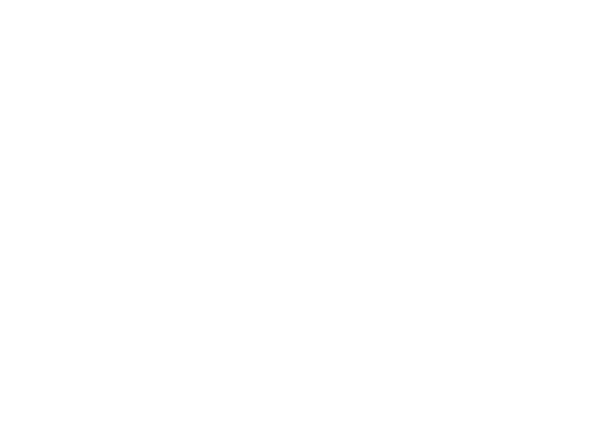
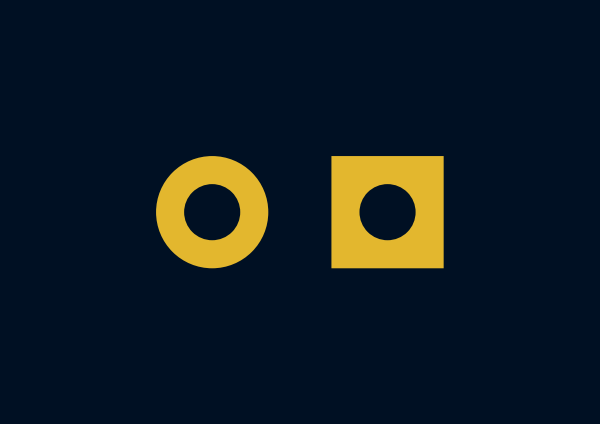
part: none -> (299, 212)

